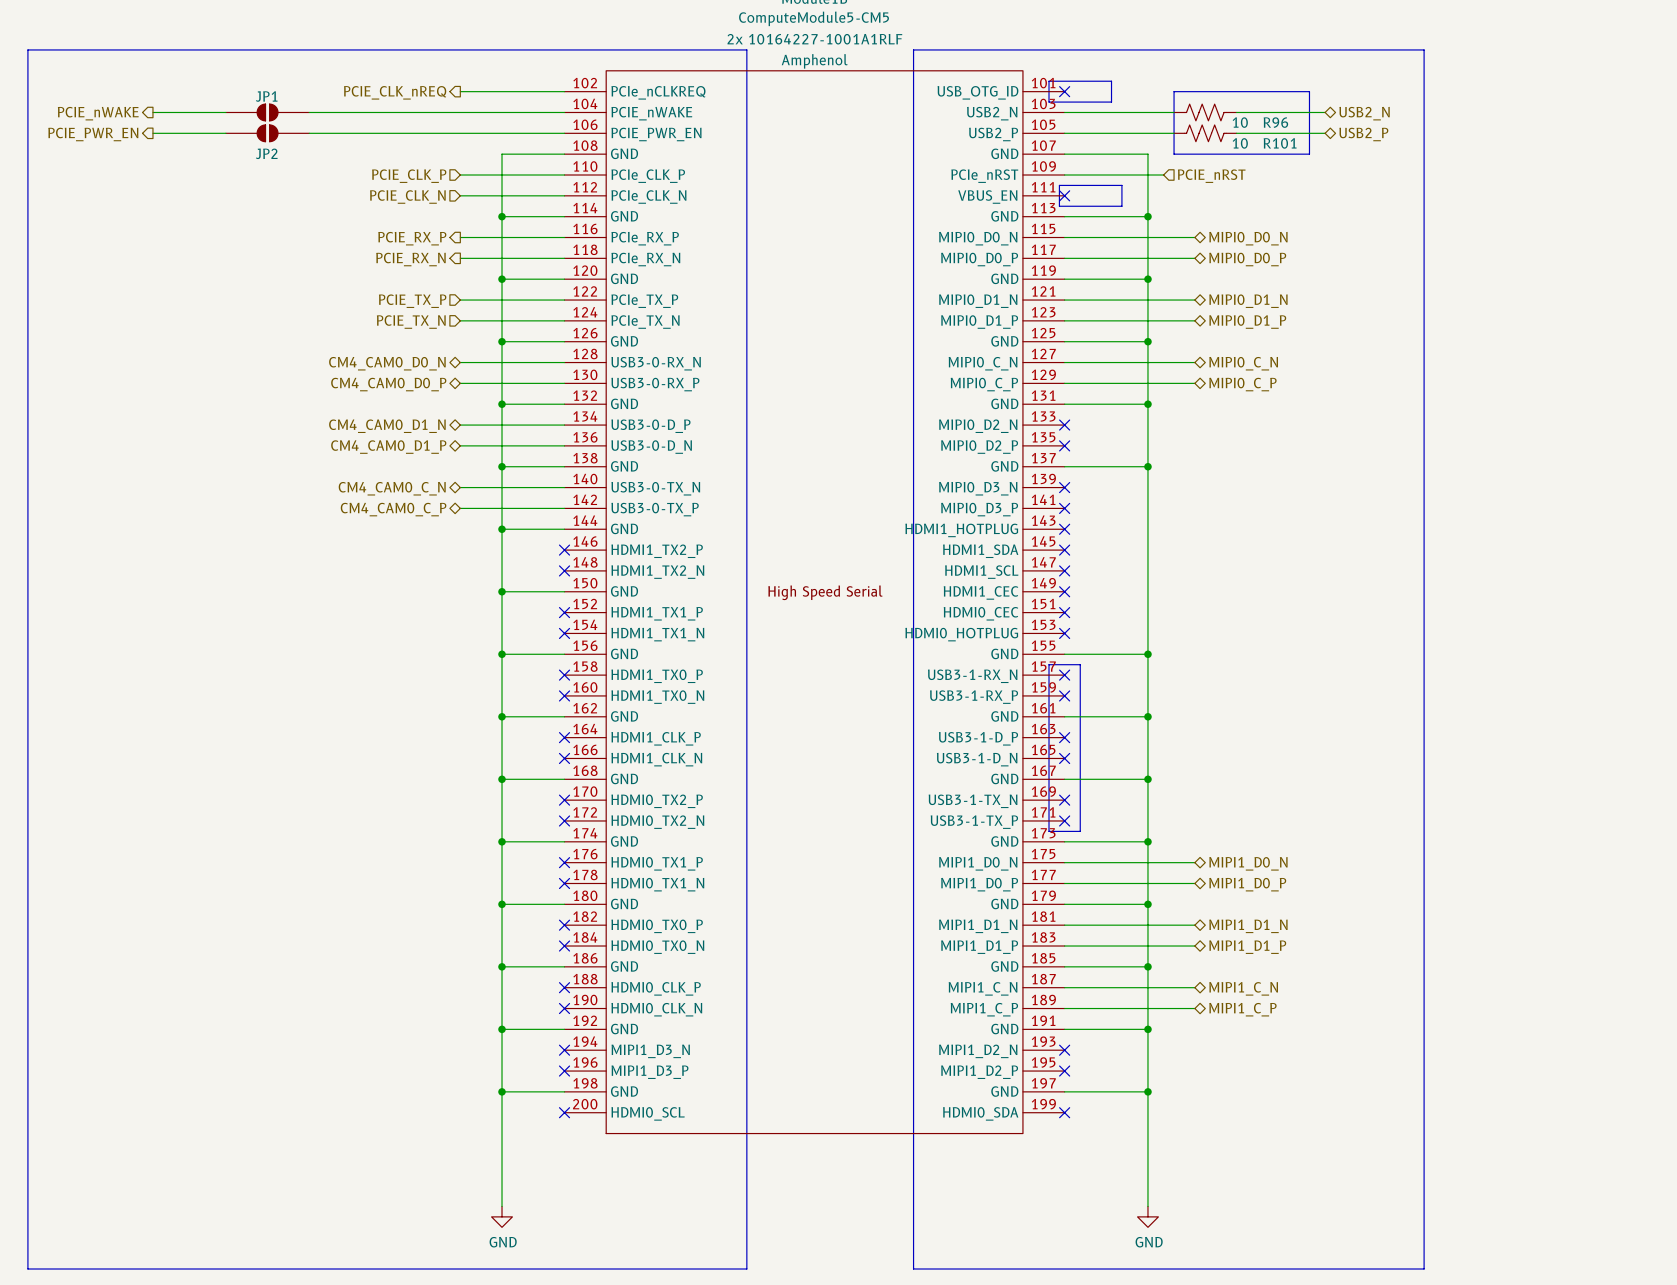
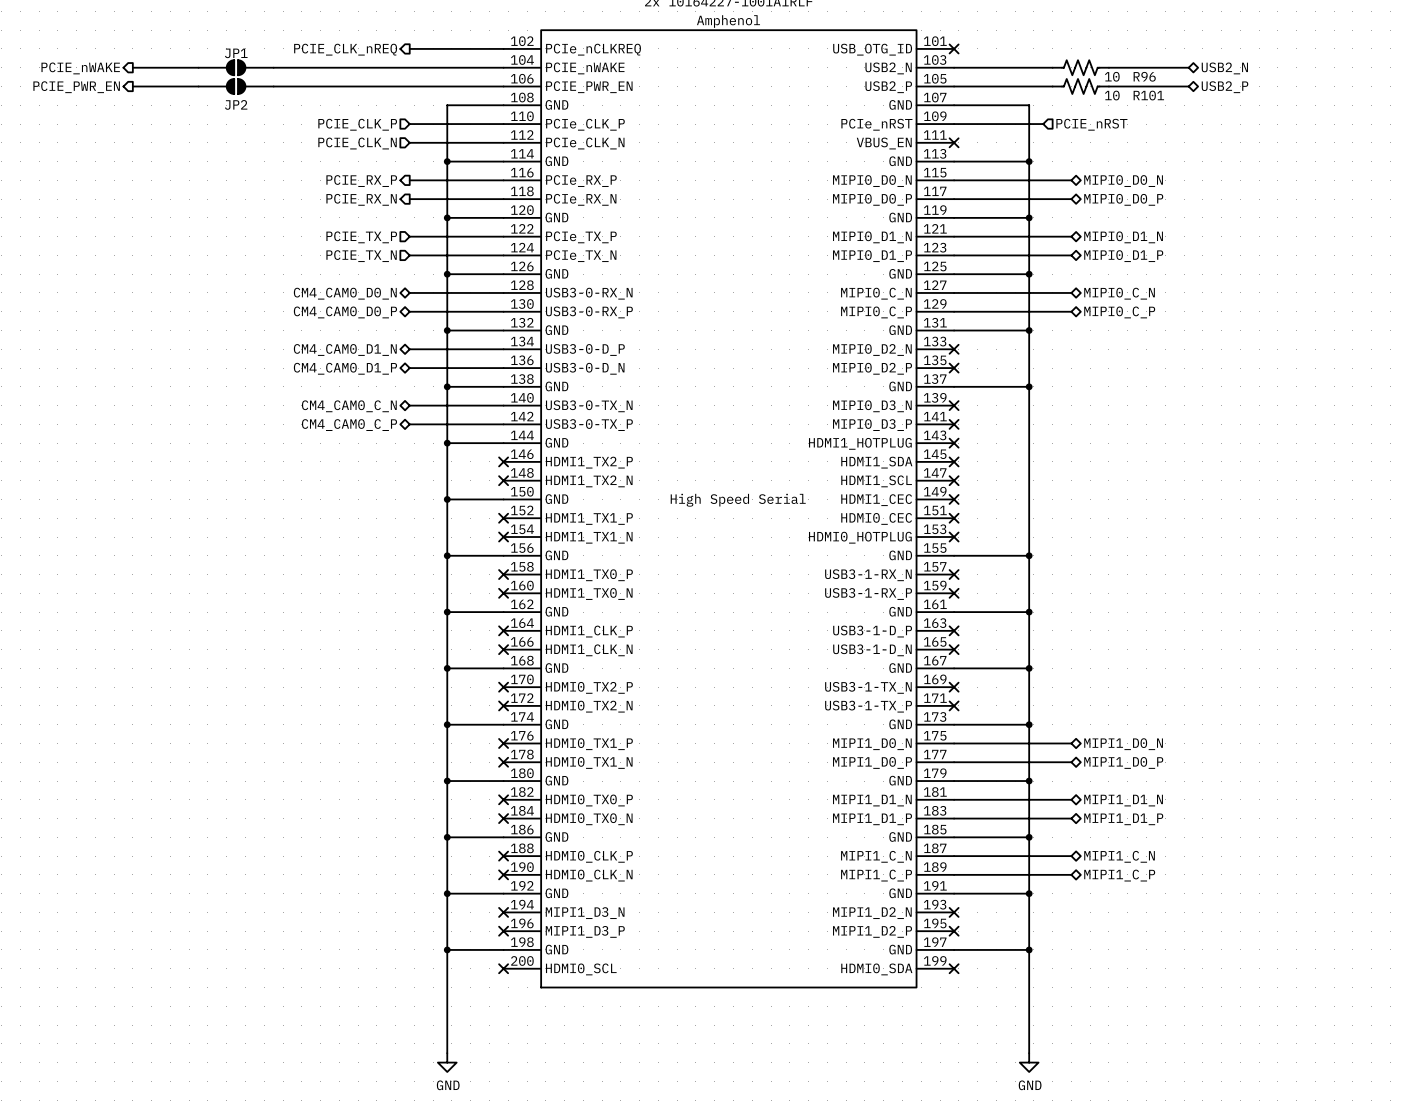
line: (27, 49) (746, 49) (746, 1269) (27, 1269) (27, 49) -> none
line: (913, 49) (1424, 49) (1424, 1269) (913, 1269) (913, 49) -> none
line: (1049, 81) (1049, 102) (1111, 102) (1111, 81) (1049, 81) -> none
line: (1174, 91) (1309, 91) (1309, 154) (1174, 154) (1174, 91) -> none
line: (1059, 185) (1121, 185) (1121, 206) (1059, 206) (1059, 185) -> none
line: (1049, 664) (1080, 664) (1080, 831) (1049, 831) (1049, 664) -> none

